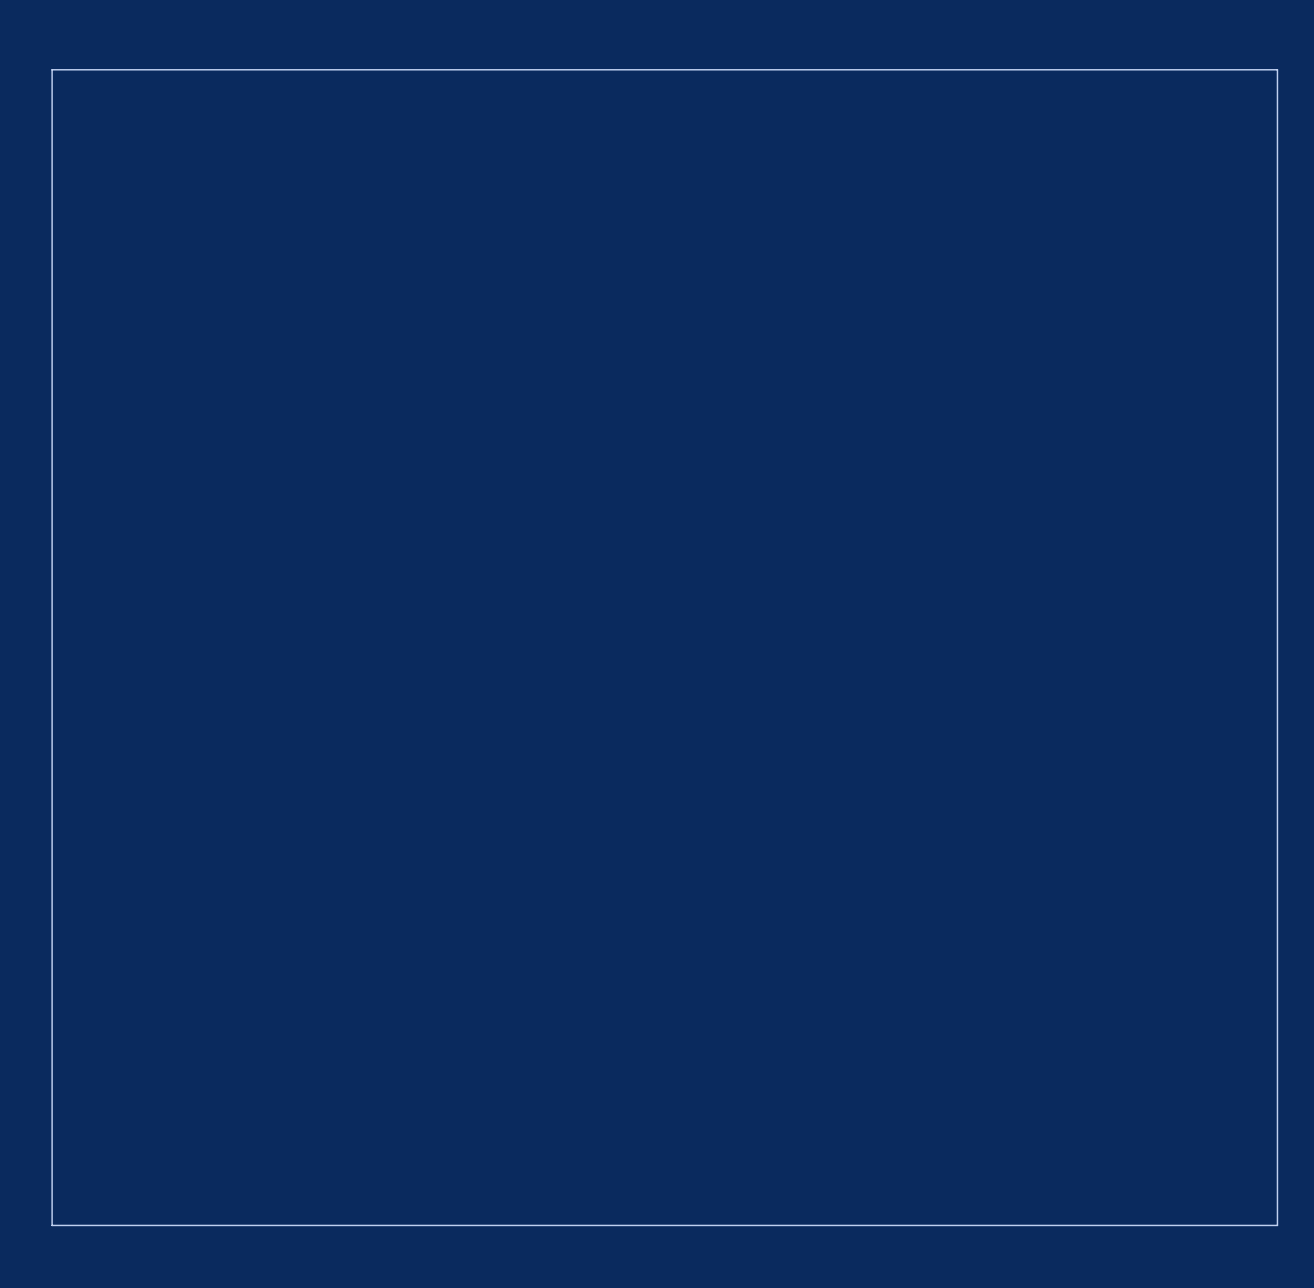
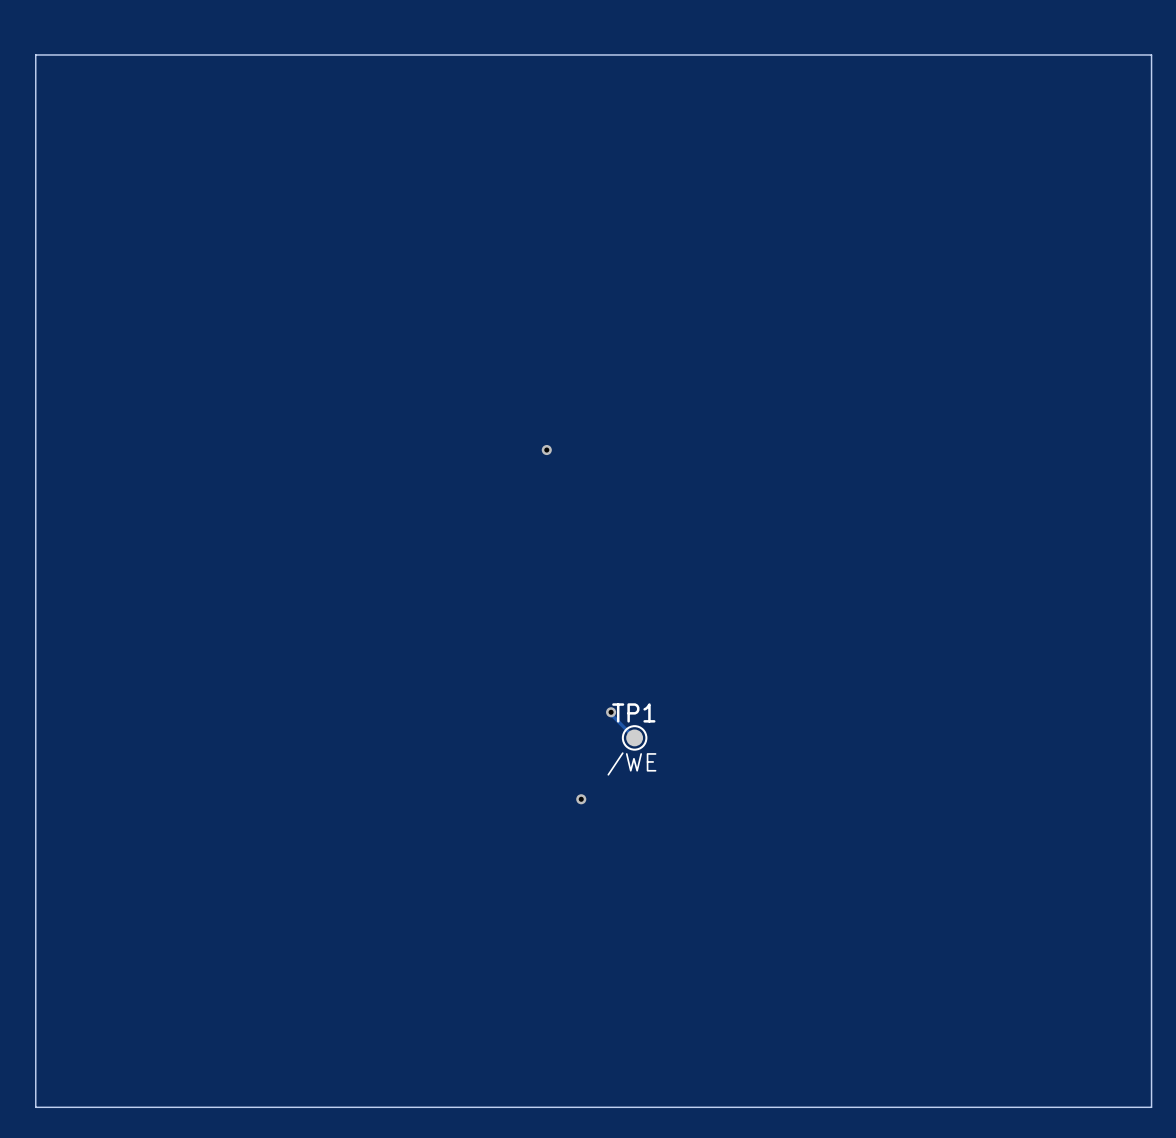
via: none -> (546, 450)
track: none -> (611, 712) (634, 737)
via: none -> (611, 712)
TP1: none -> (634, 737)
text: none -> /WE (631, 763)
via: none -> (581, 799)

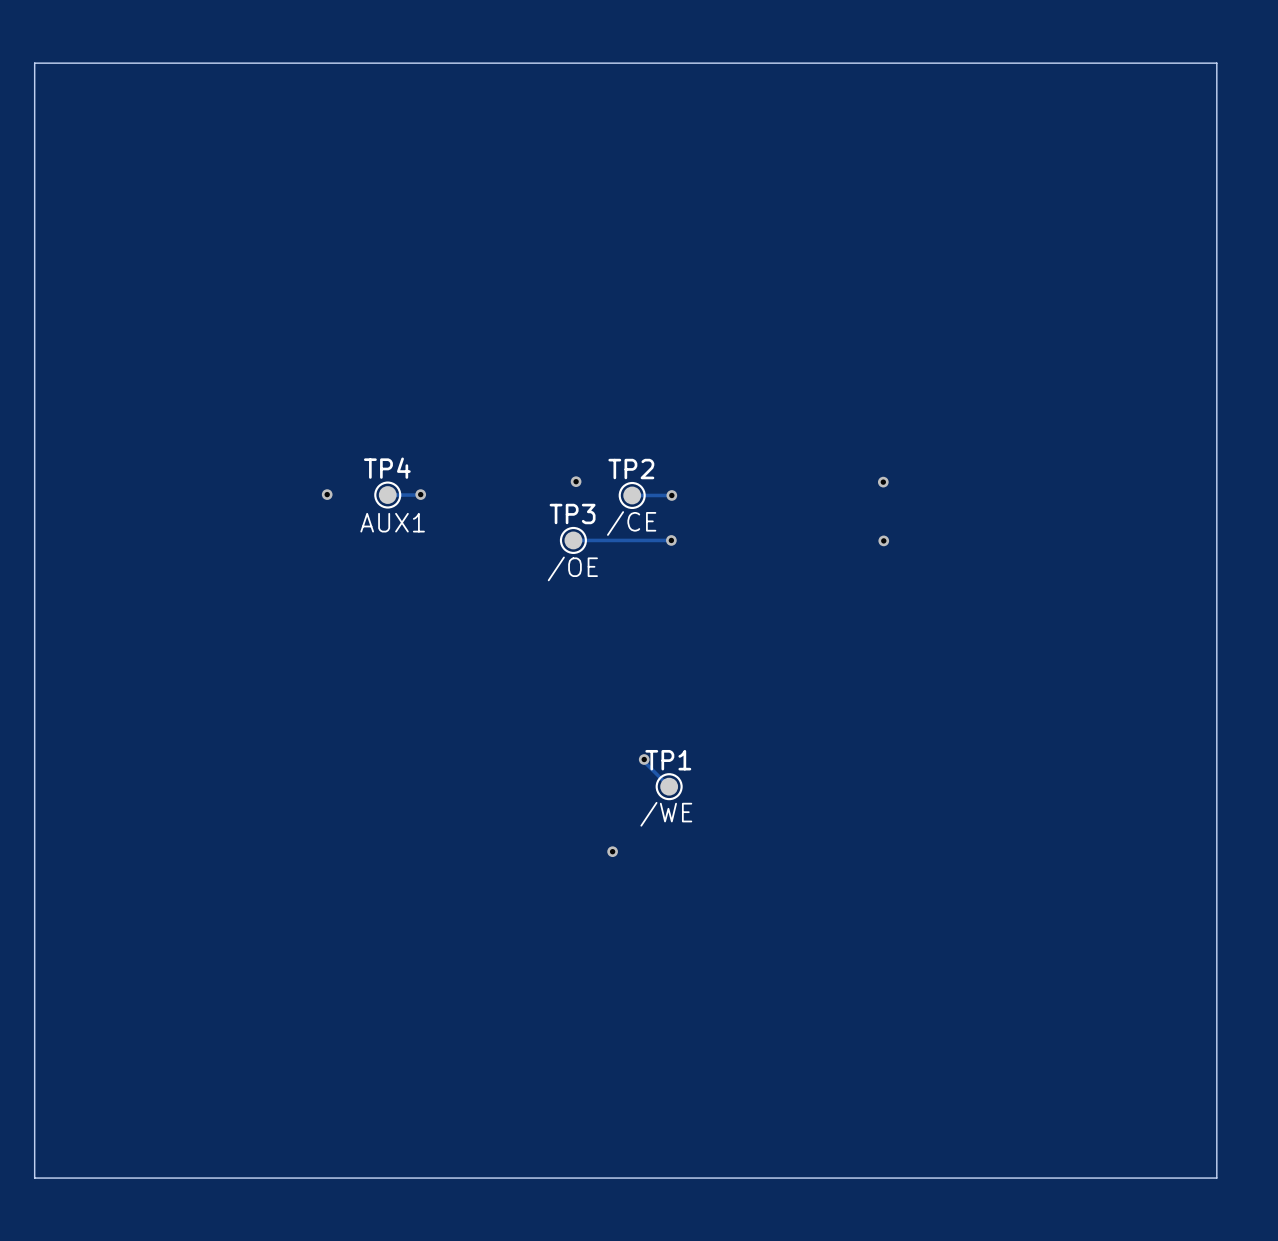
via: none -> (883, 482)
via: none -> (327, 494)
TP4: none -> (387, 495)
track: none -> (420, 494) (387, 495)
via: none -> (420, 494)
TP2: none -> (632, 495)
track: none -> (671, 495) (632, 495)
via: none -> (671, 495)
text: none -> AUX1 (392, 522)
text: none -> /CE (631, 523)
TP3: none -> (573, 540)
track: none -> (671, 540) (573, 540)
via: none -> (671, 540)
via: none -> (883, 540)
text: none -> /OE (572, 568)

